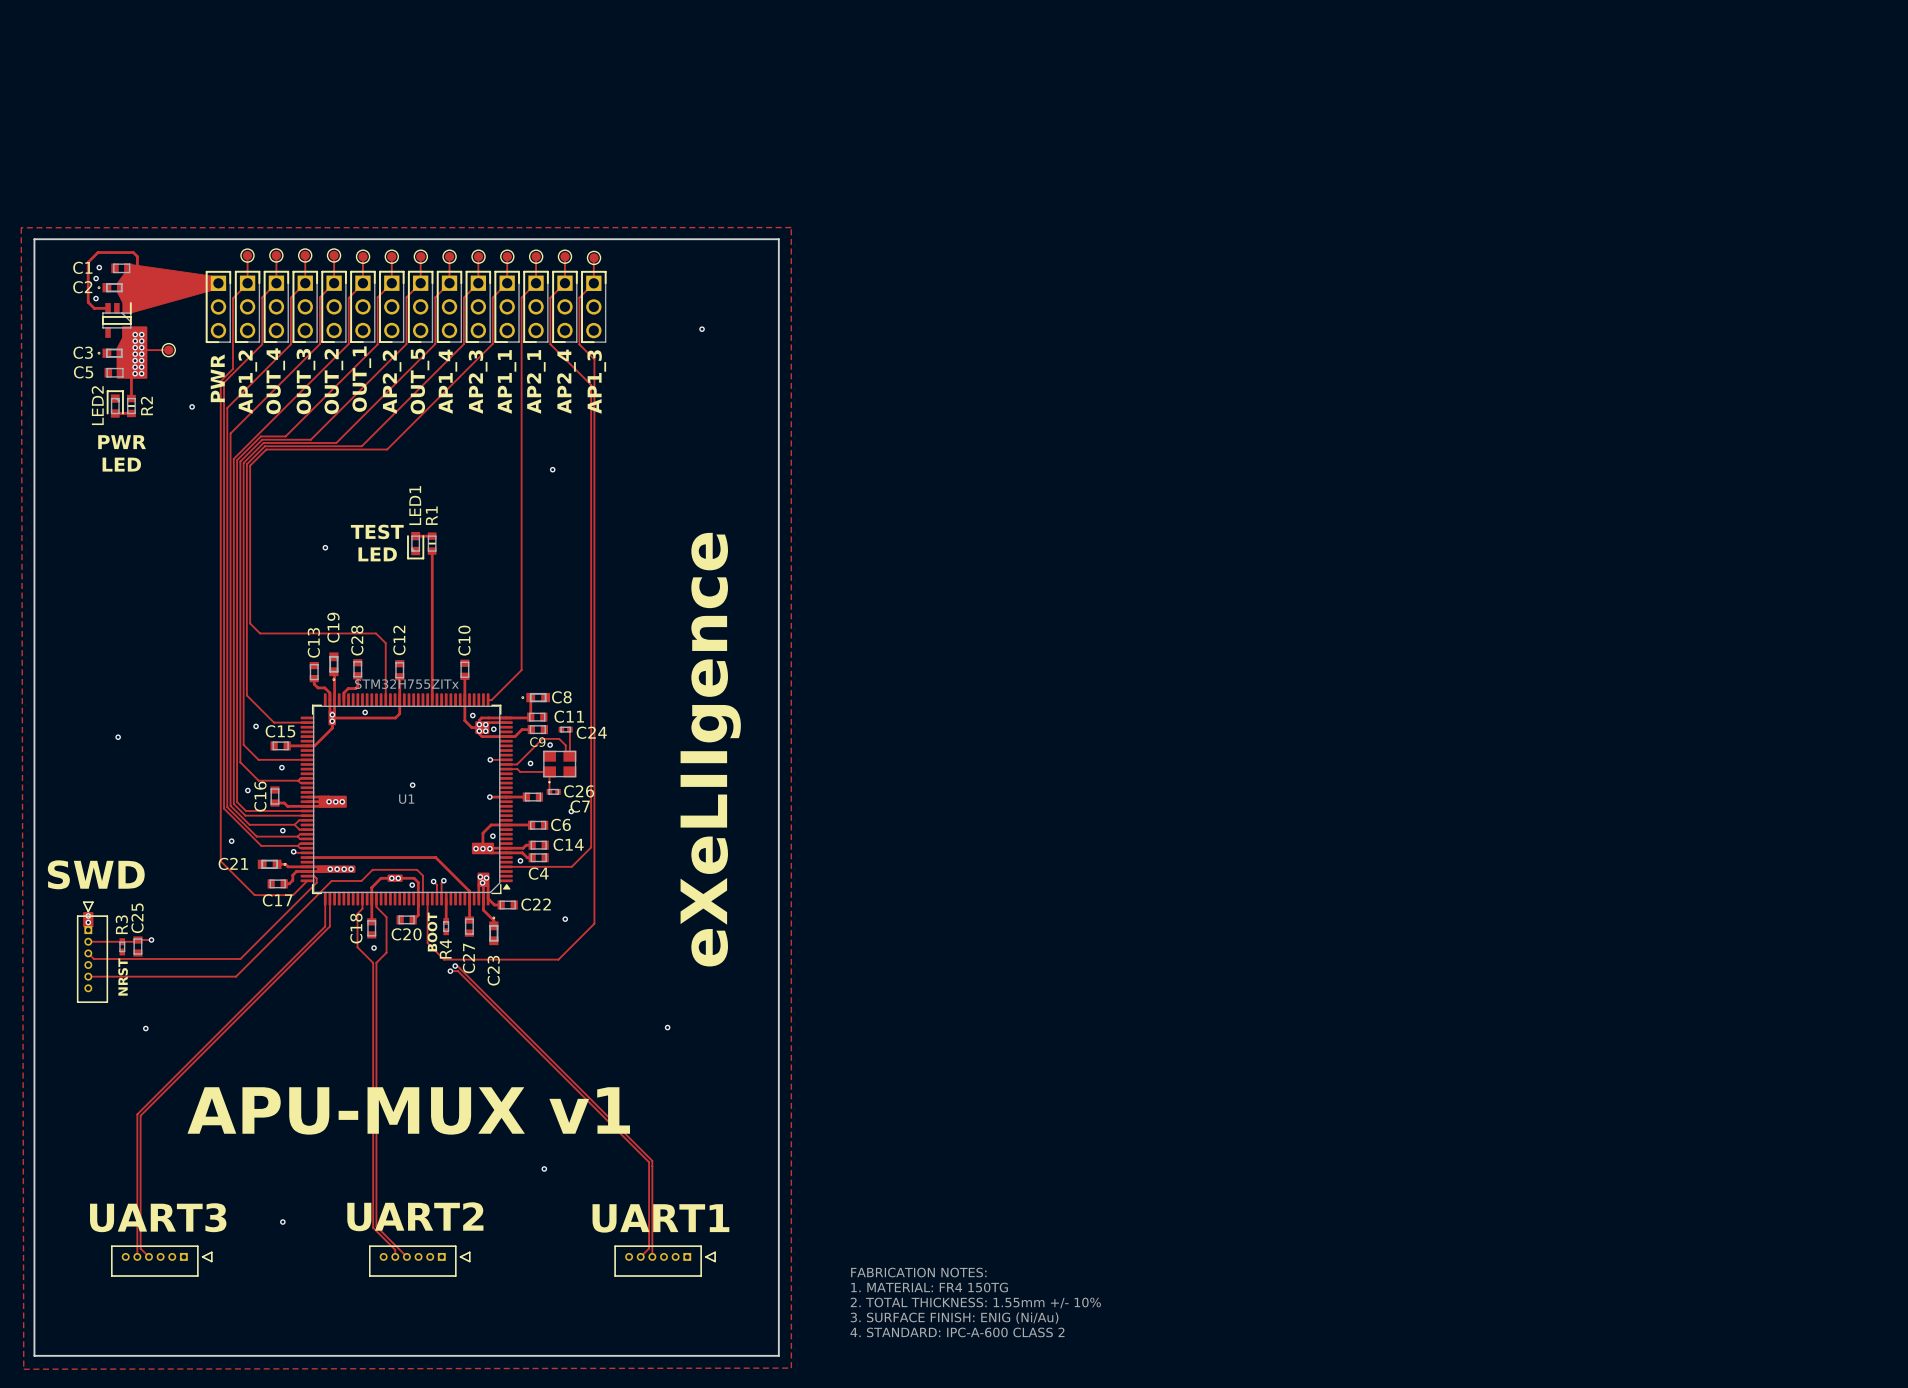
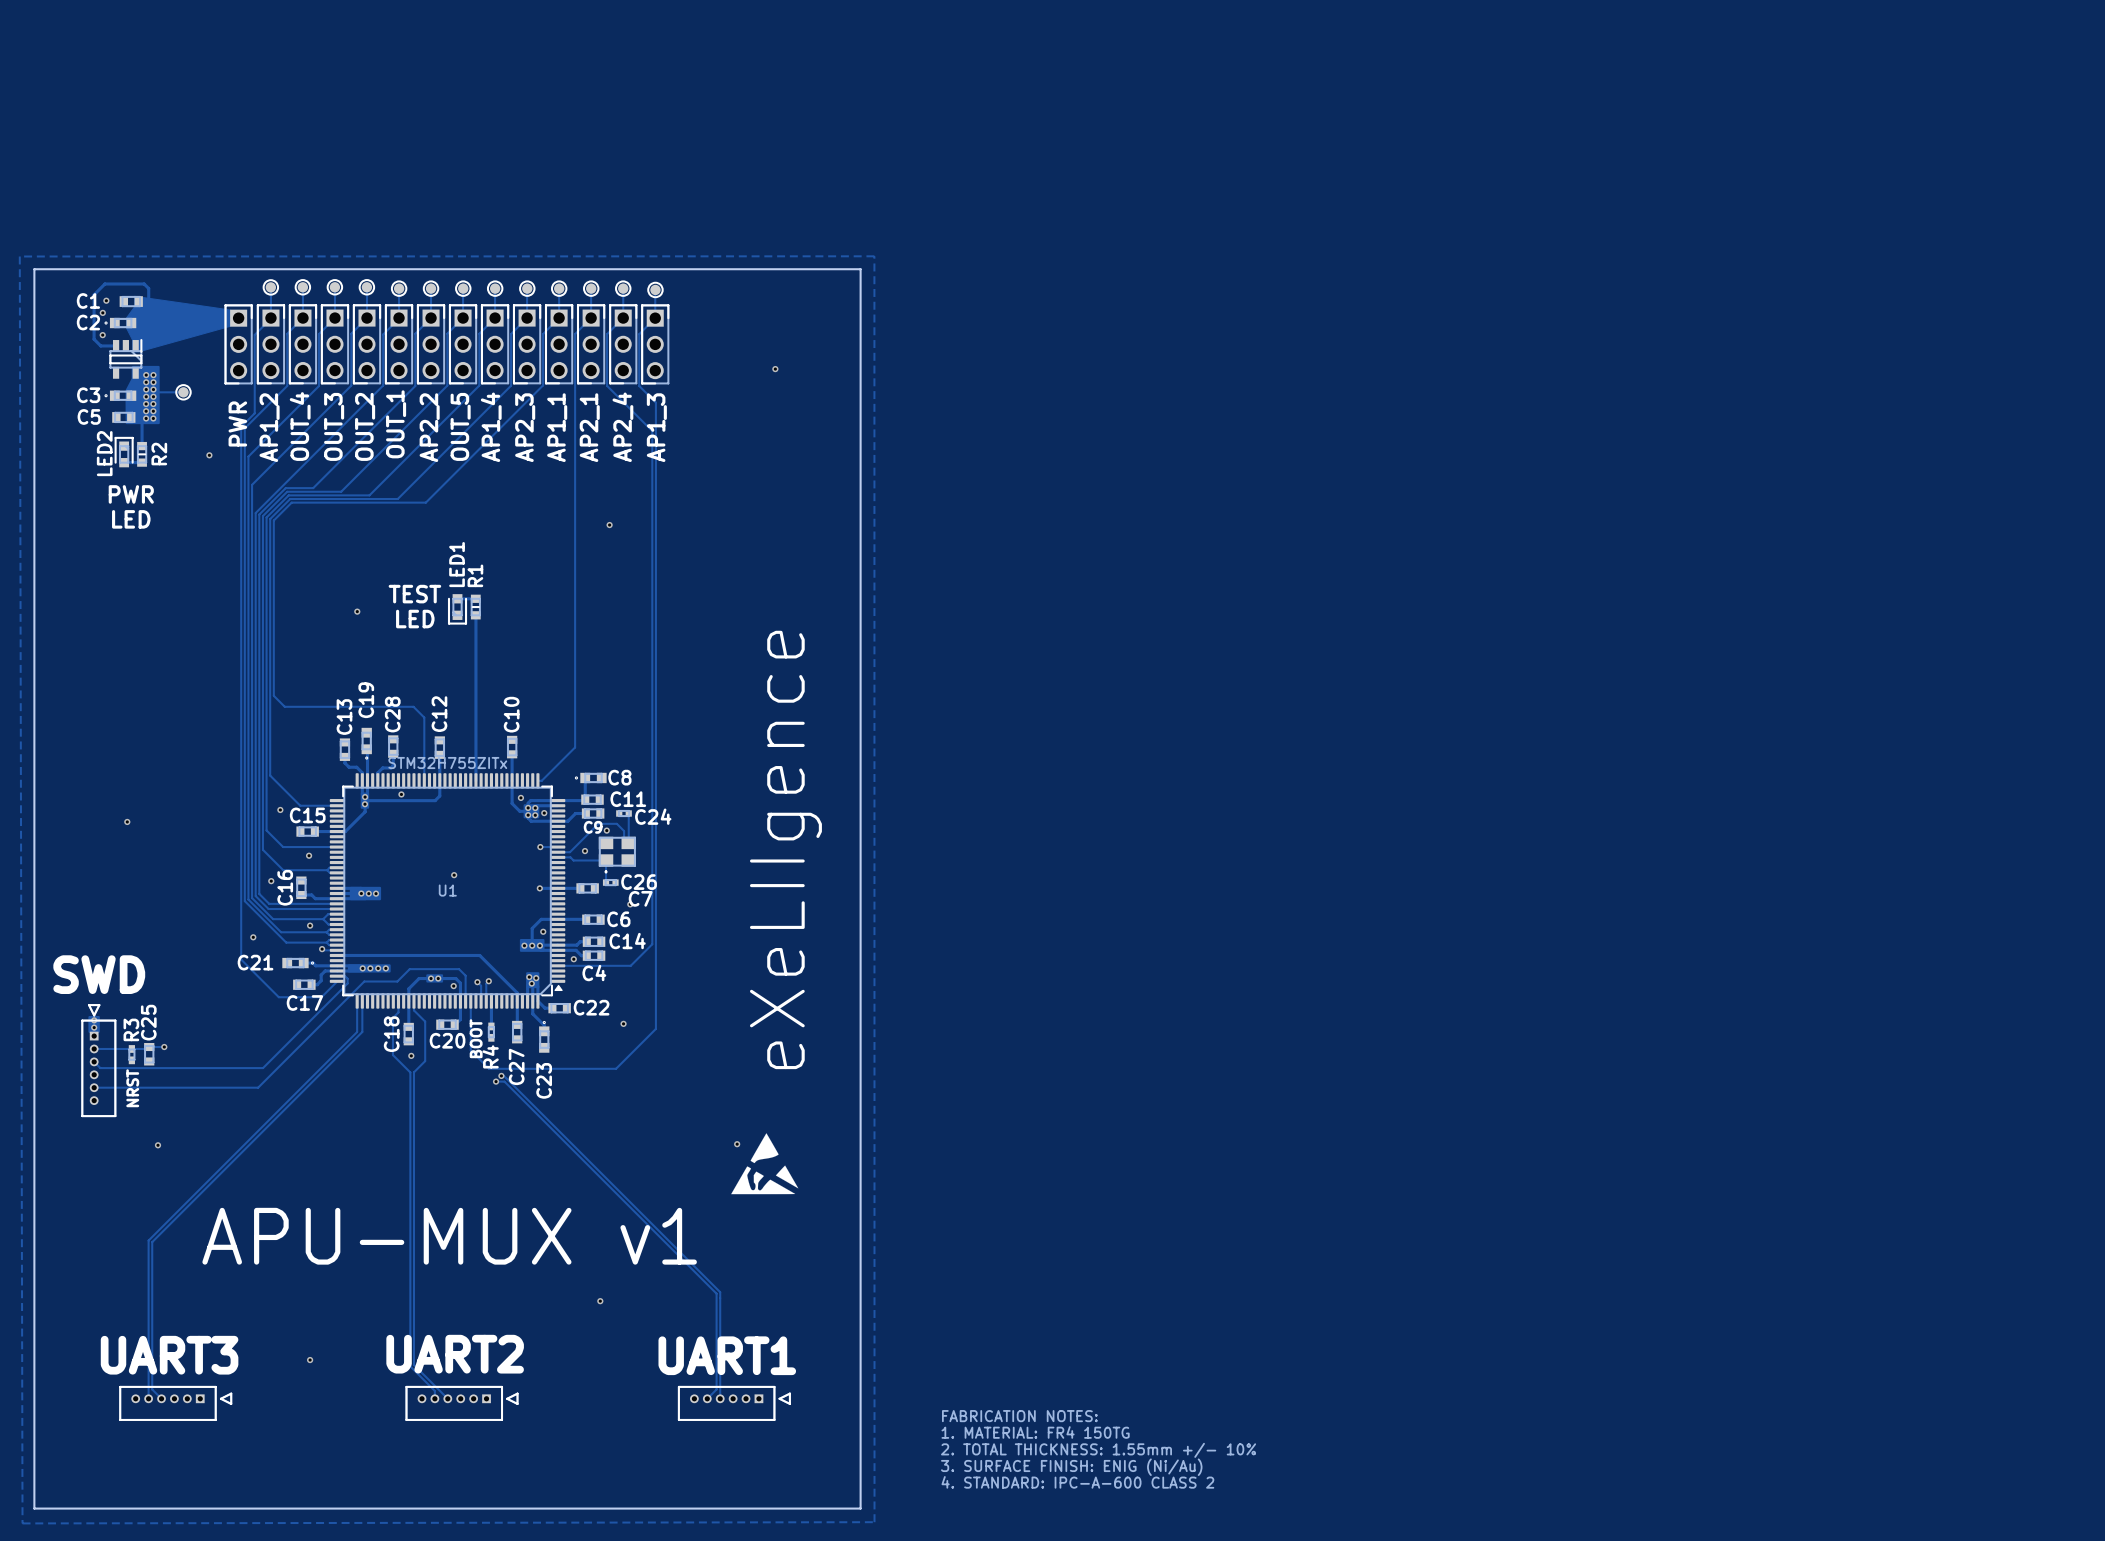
drawing: none -> [731, 1133, 799, 1195]

